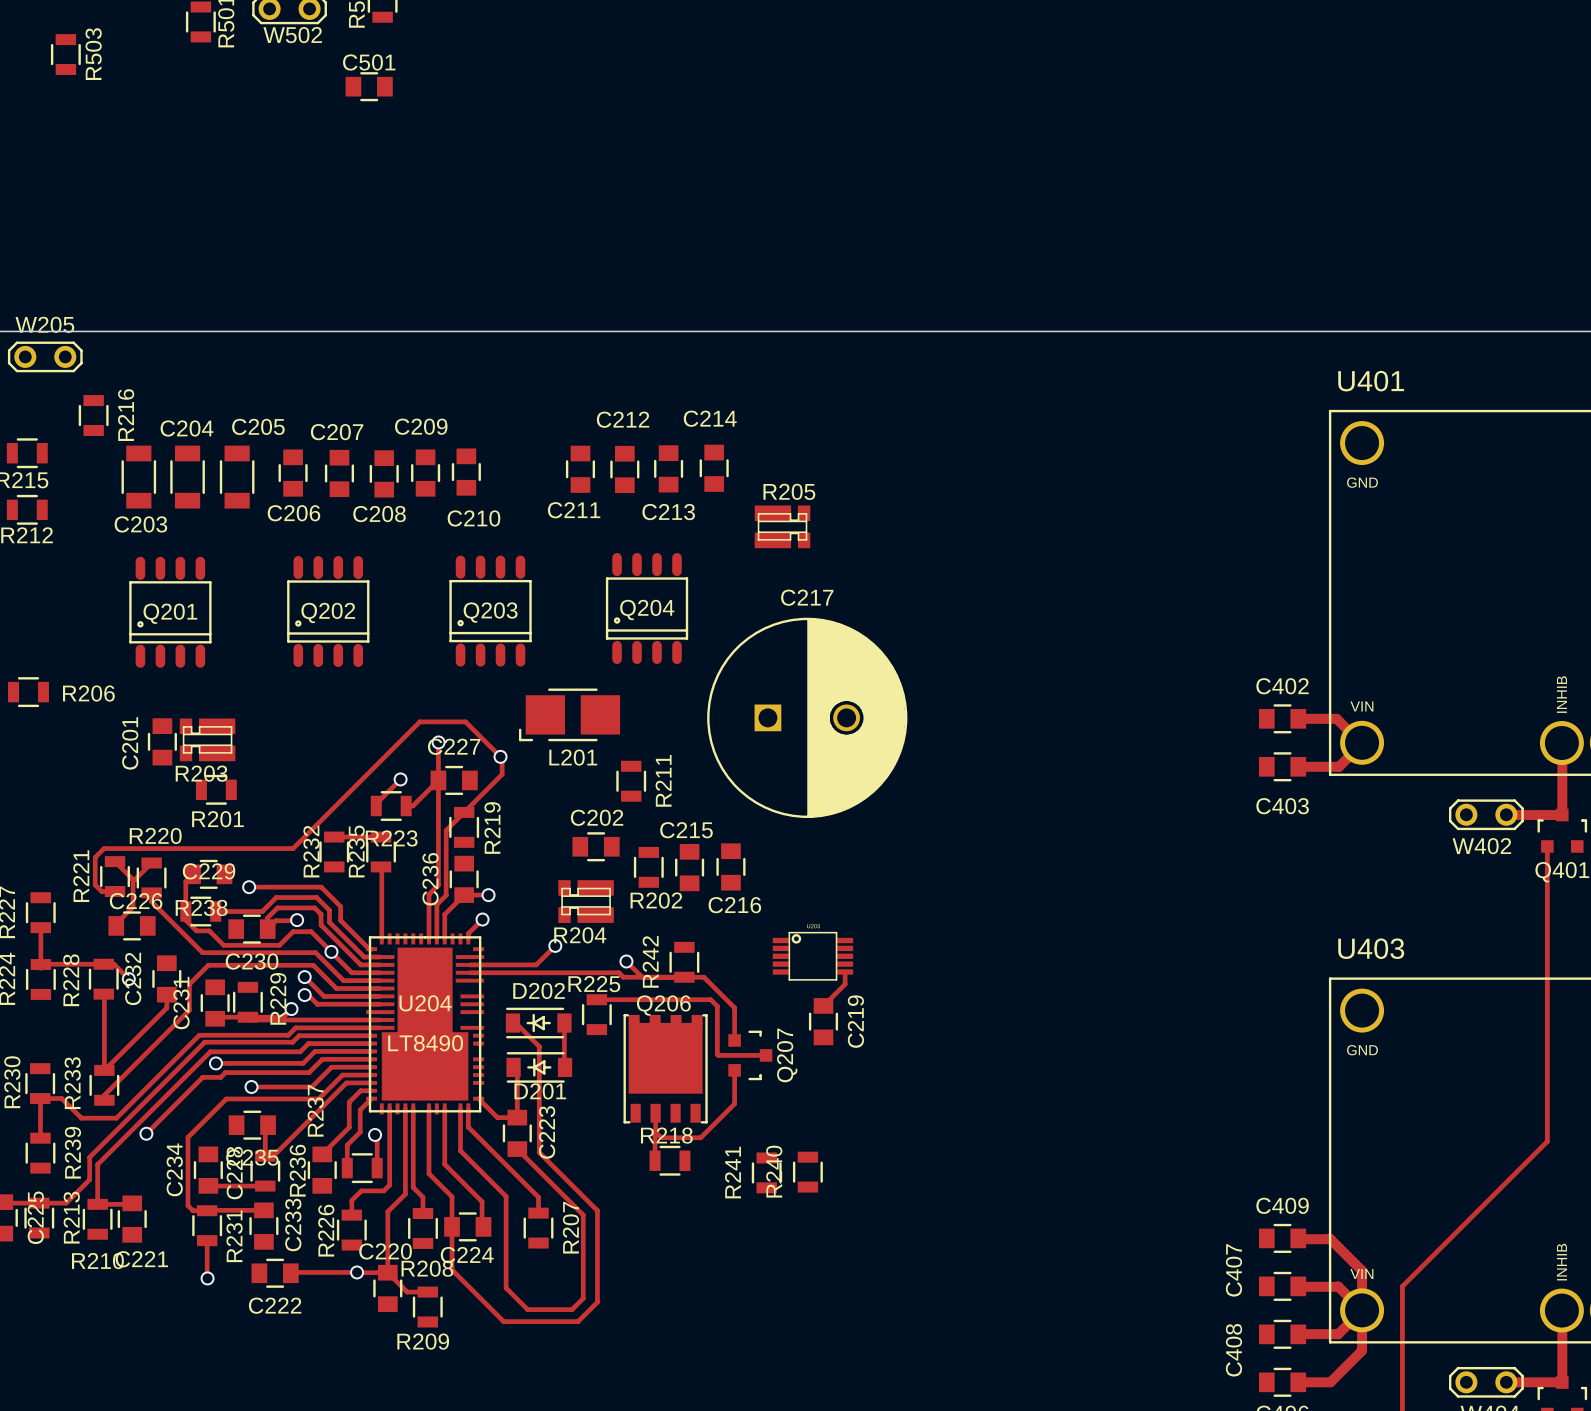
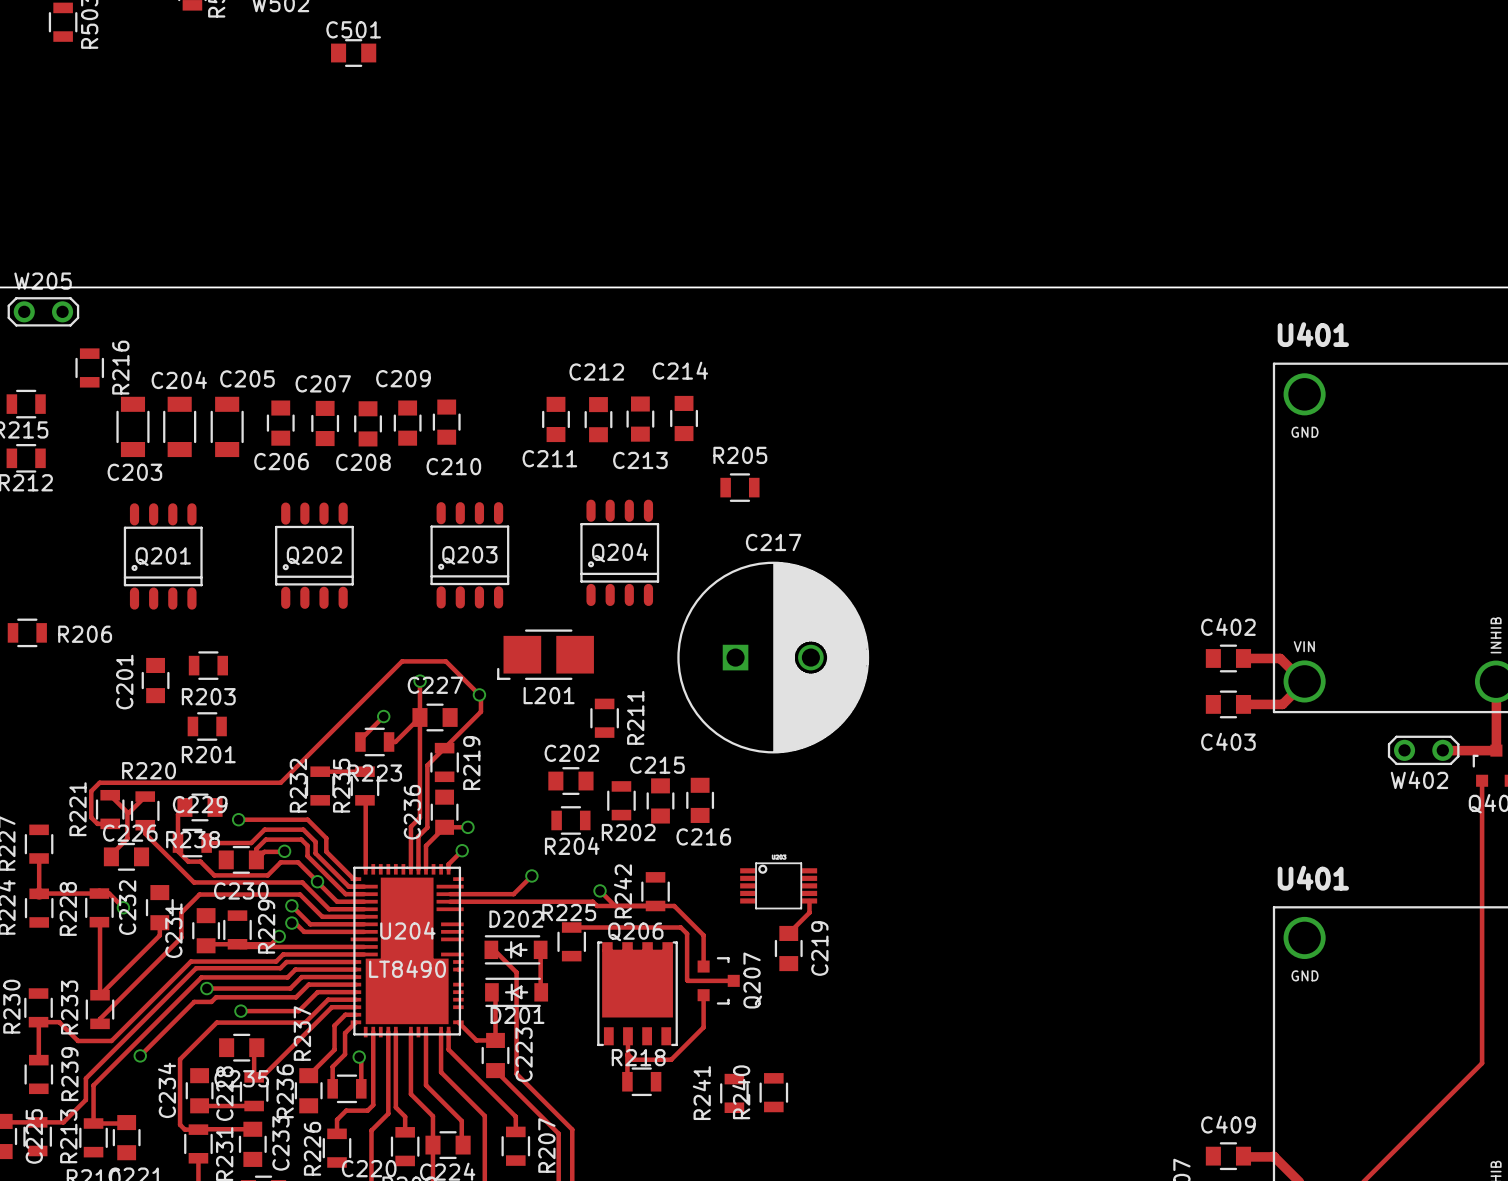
R205 footprint: [754, 505, 811, 549] -> [720, 473, 760, 502]
R203 footprint: [179, 718, 236, 762] -> [188, 651, 228, 680]
R204 footprint: [558, 880, 614, 923] -> [551, 806, 591, 835]
U403 name: U403 (1371, 948) -> U401 (1313, 878)

